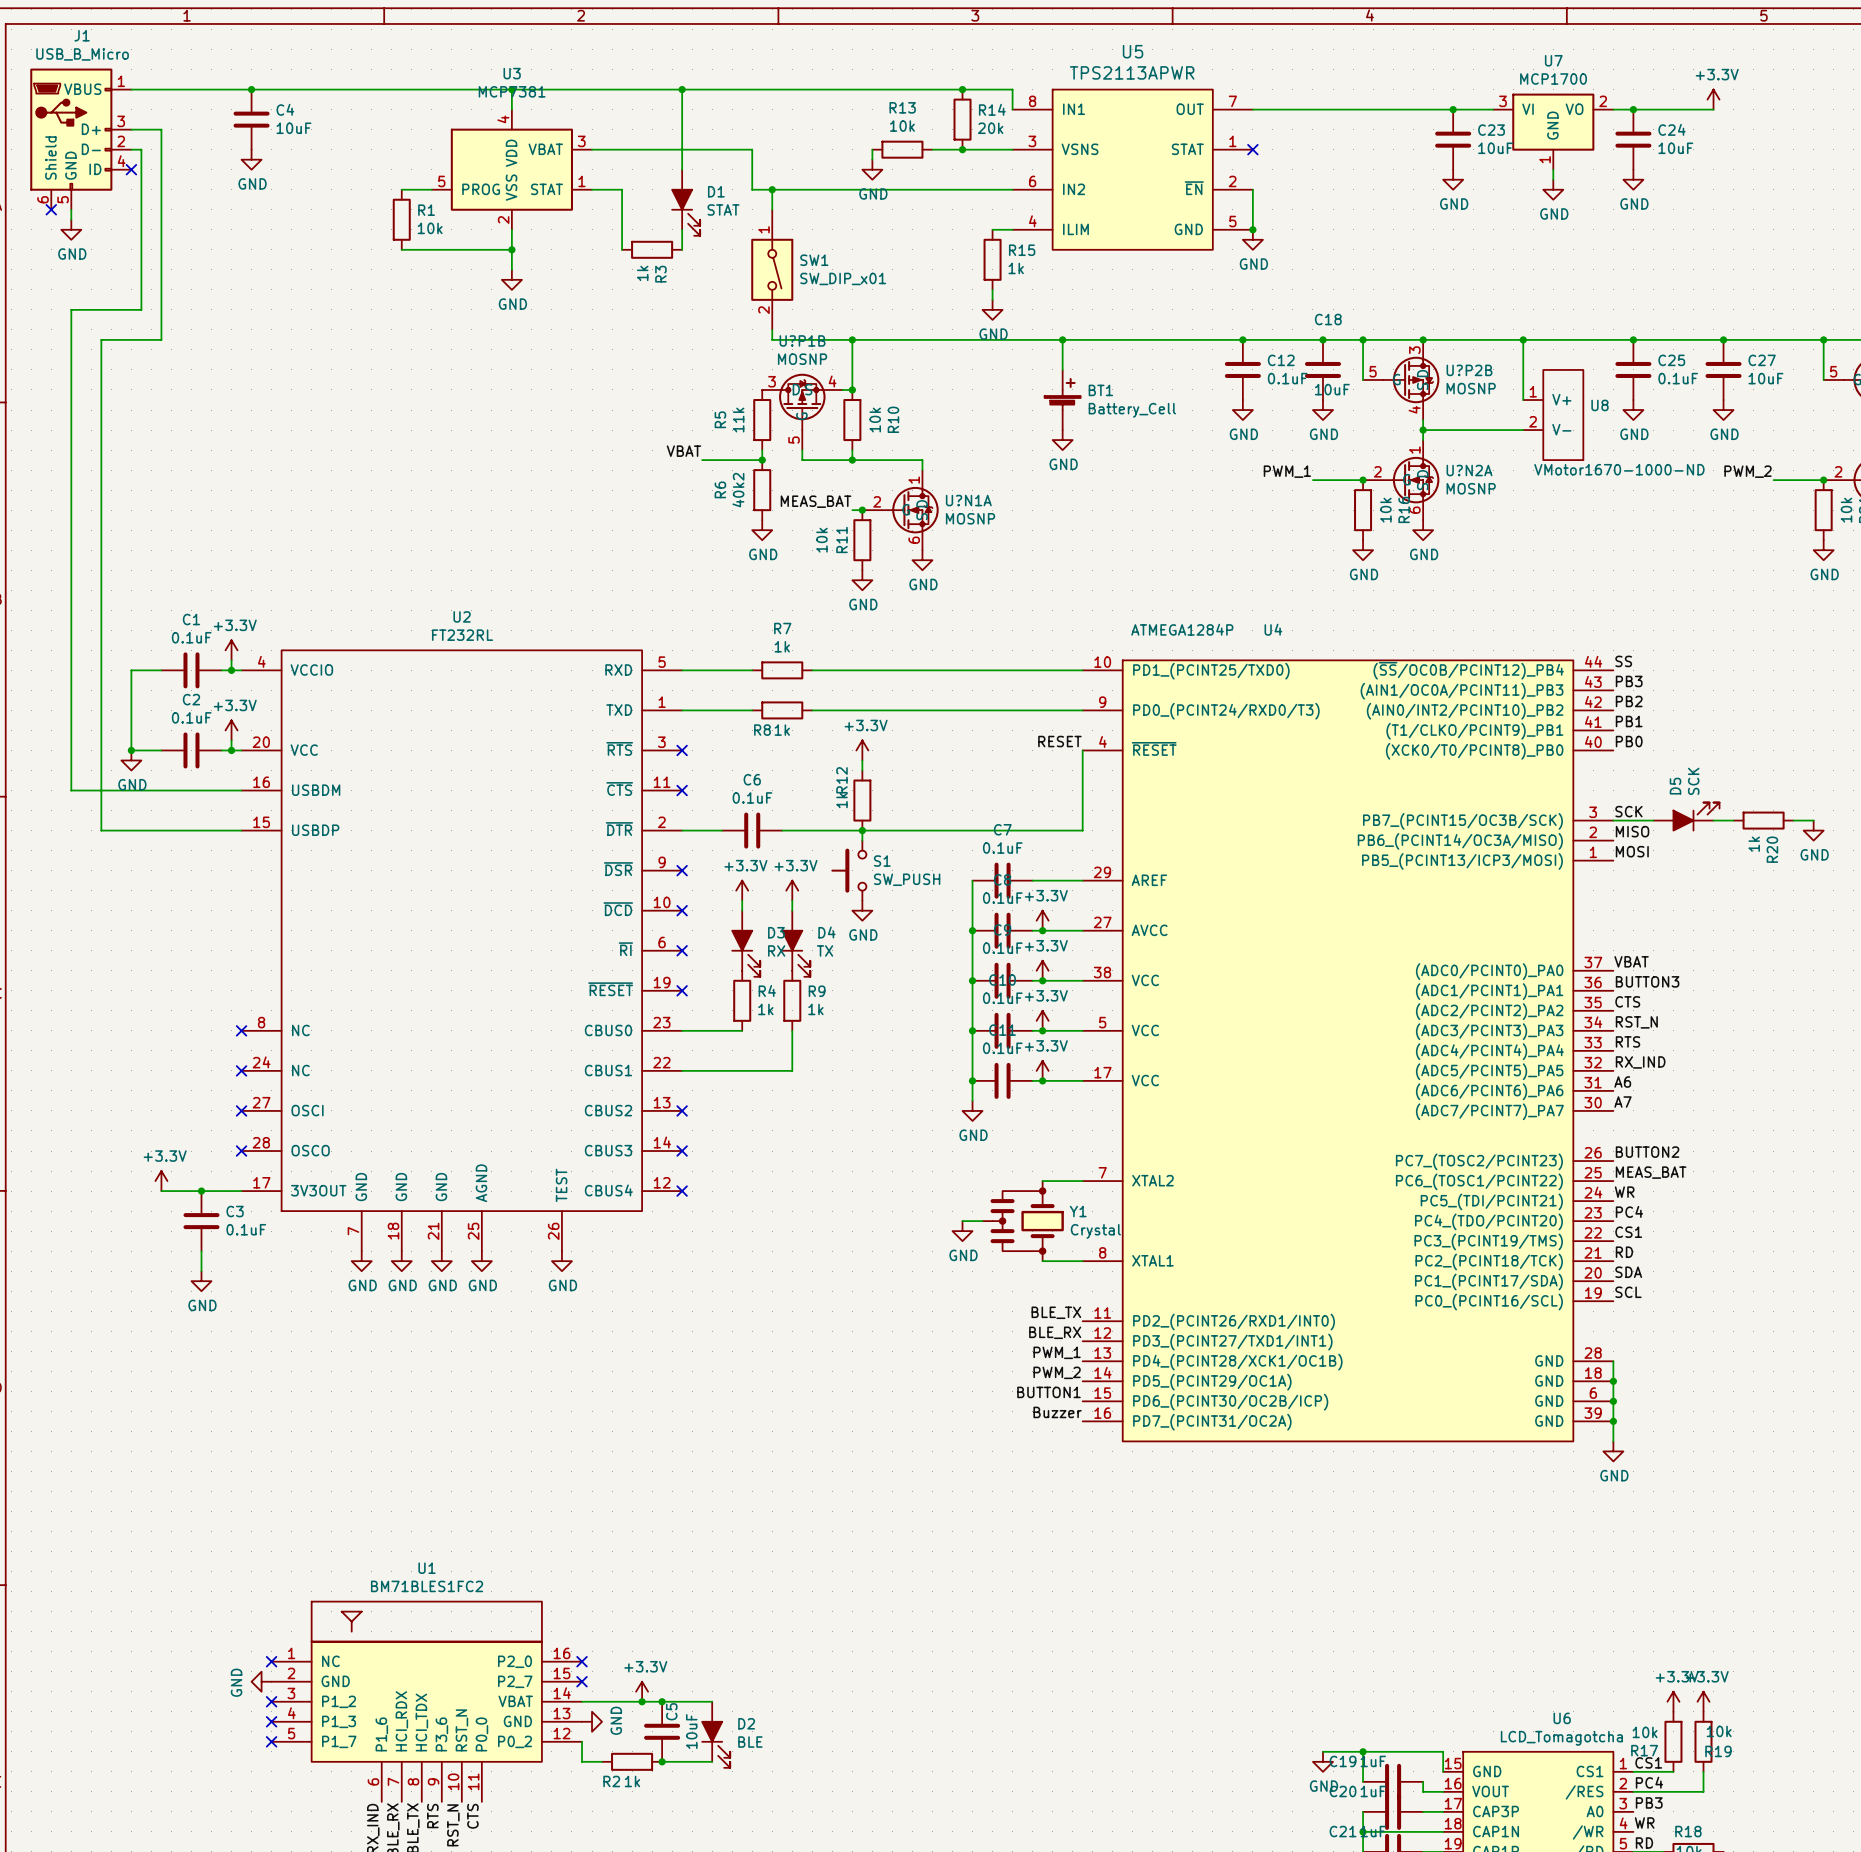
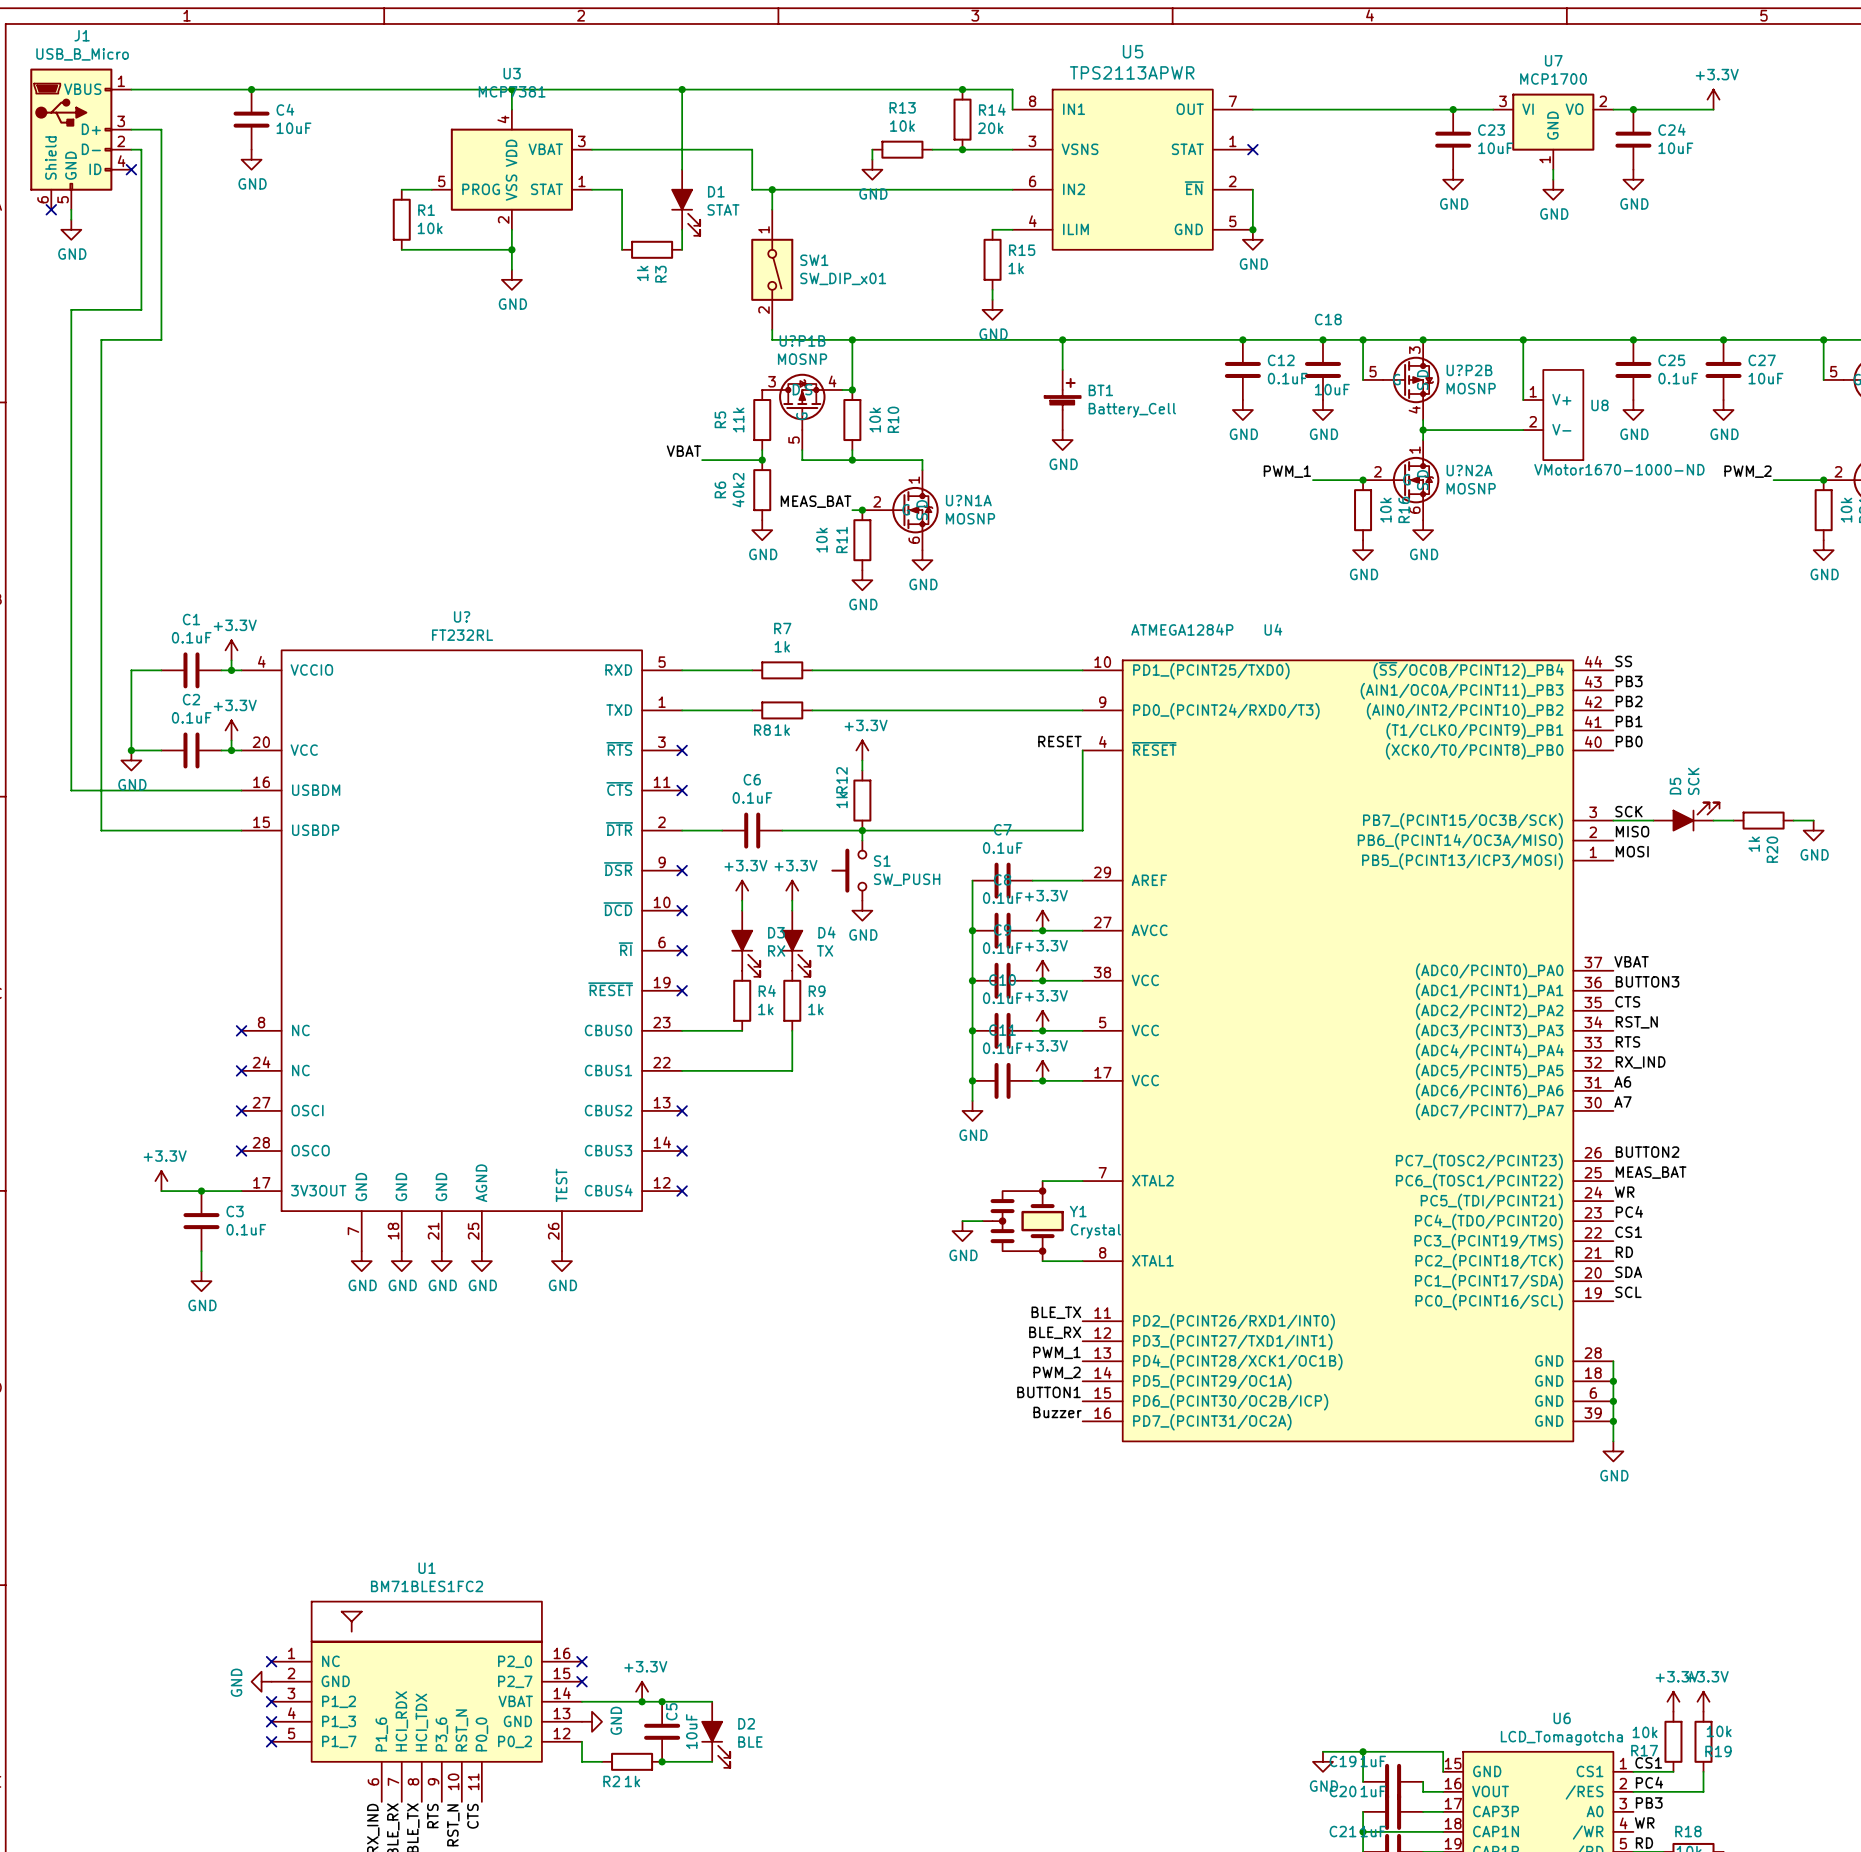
U2 name: U2 (462, 616) -> U? (462, 616)

